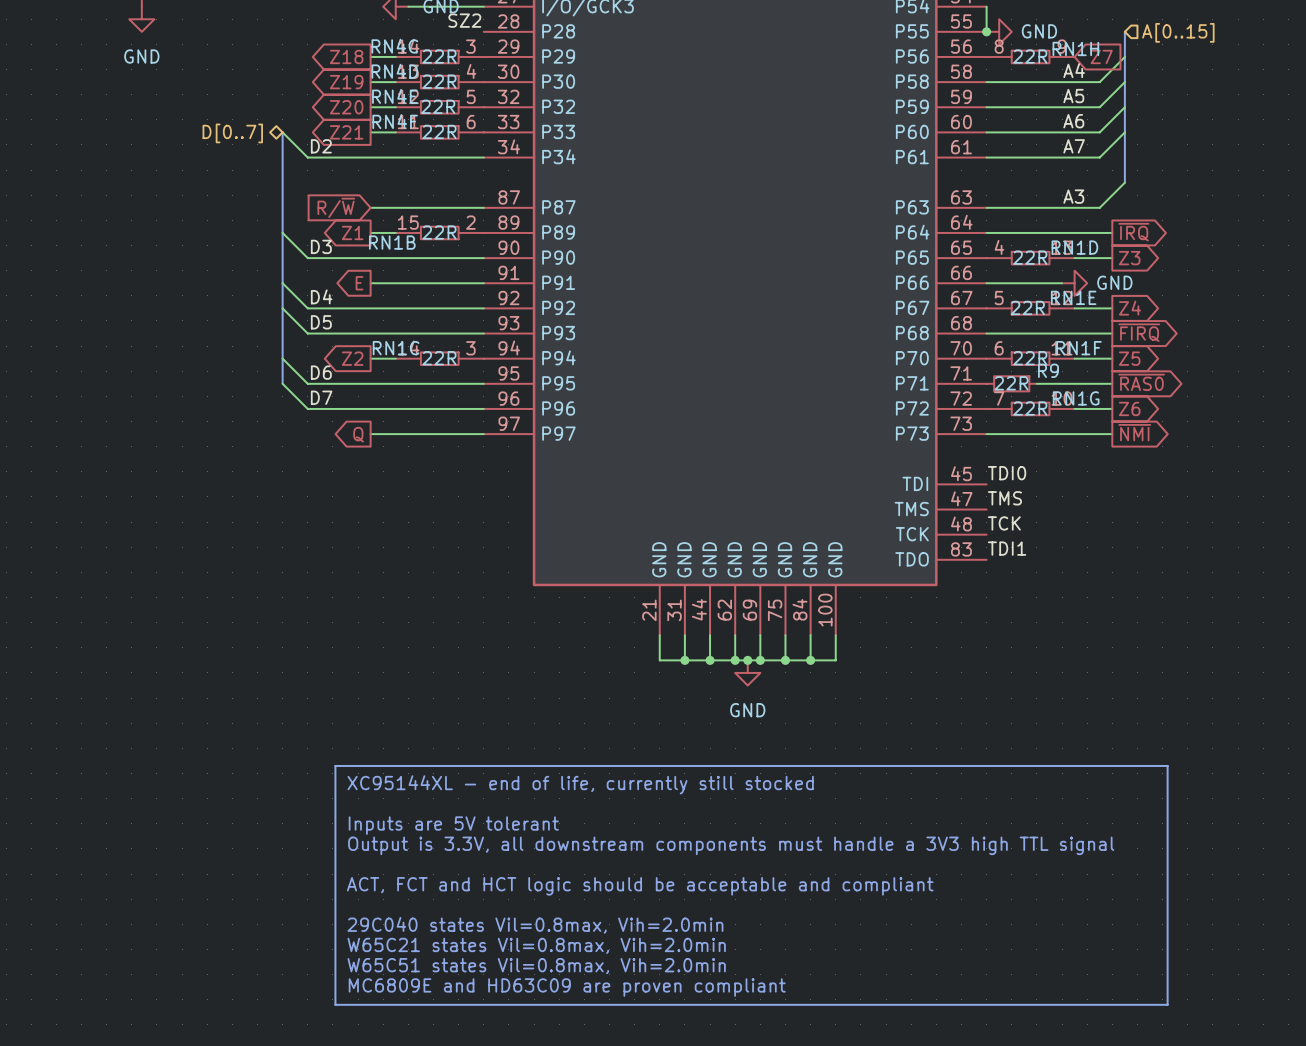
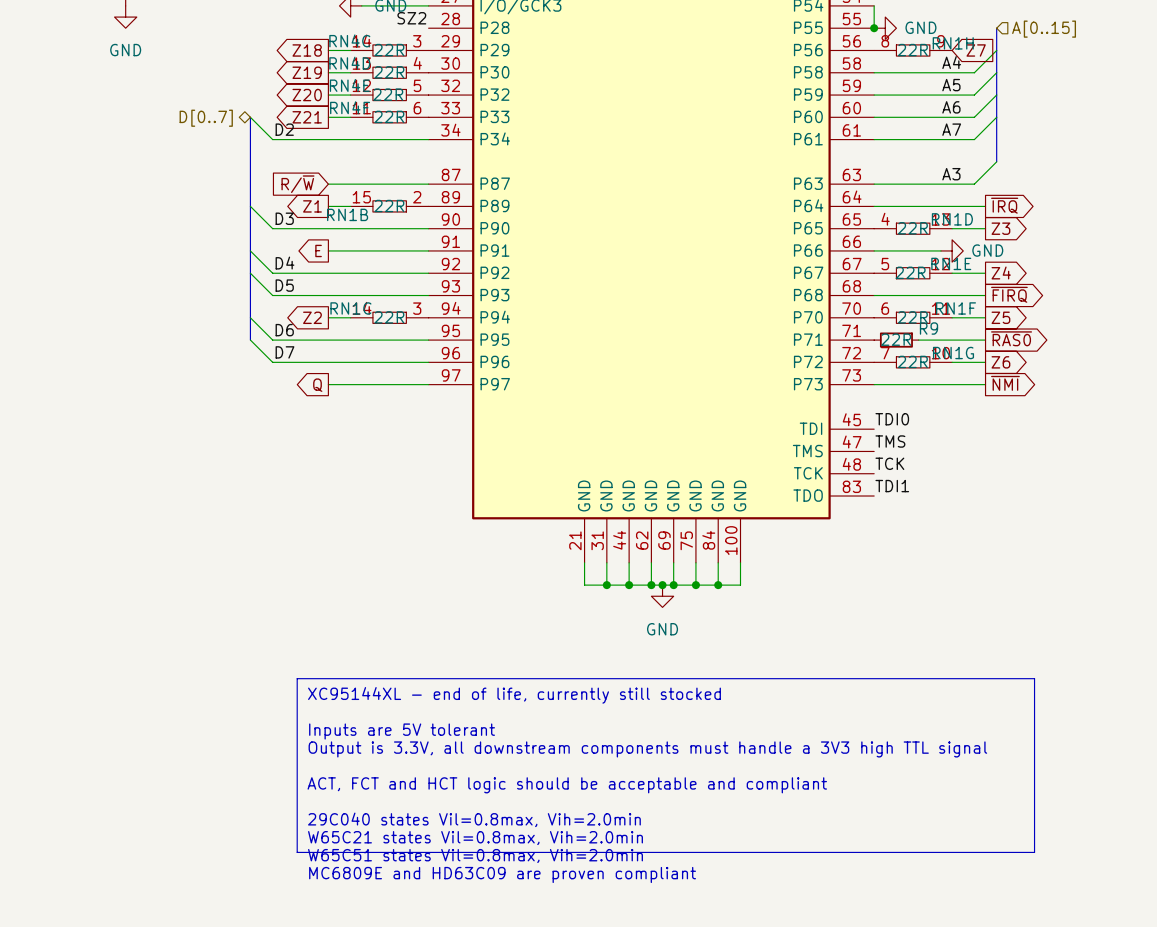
line: (335, 962) (335, 1004) (1167, 1004) (1167, 962) -> (297, 852) (1034, 852)

